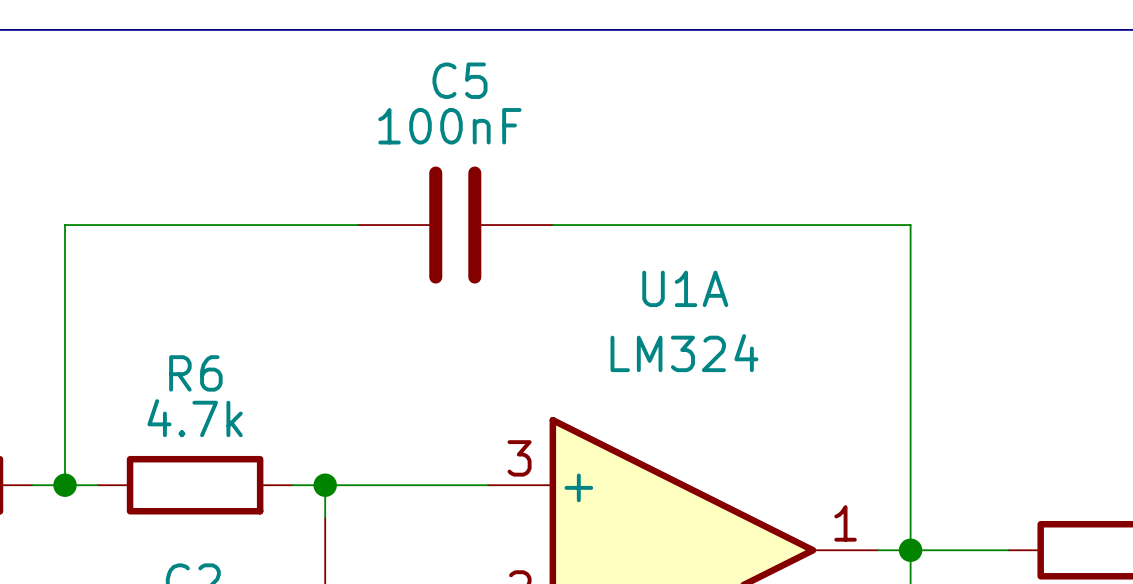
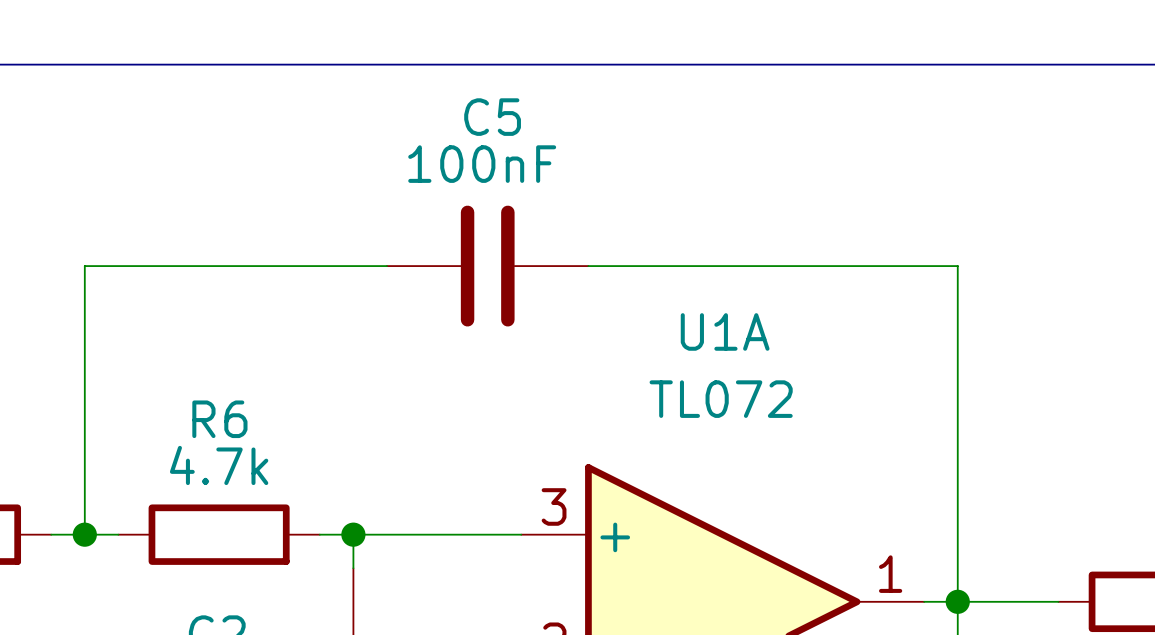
U1A value: LM324 (684, 353) -> TL072 (721, 399)

